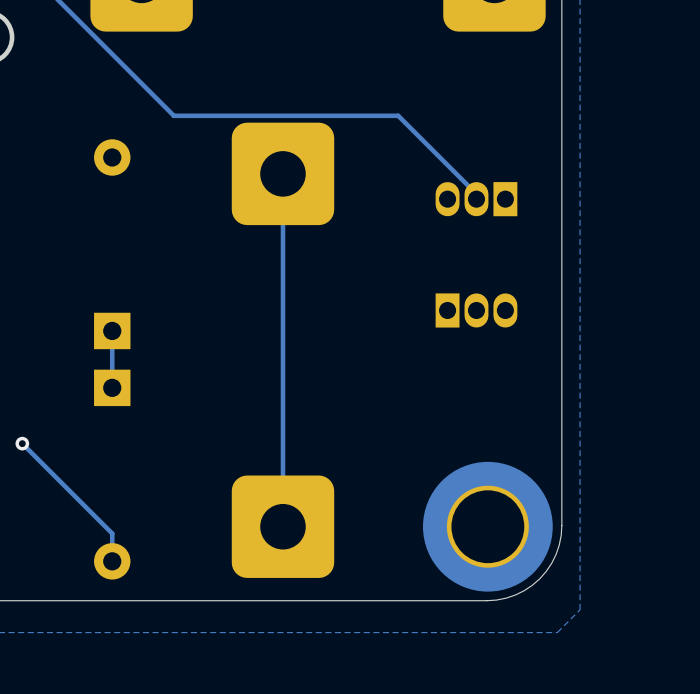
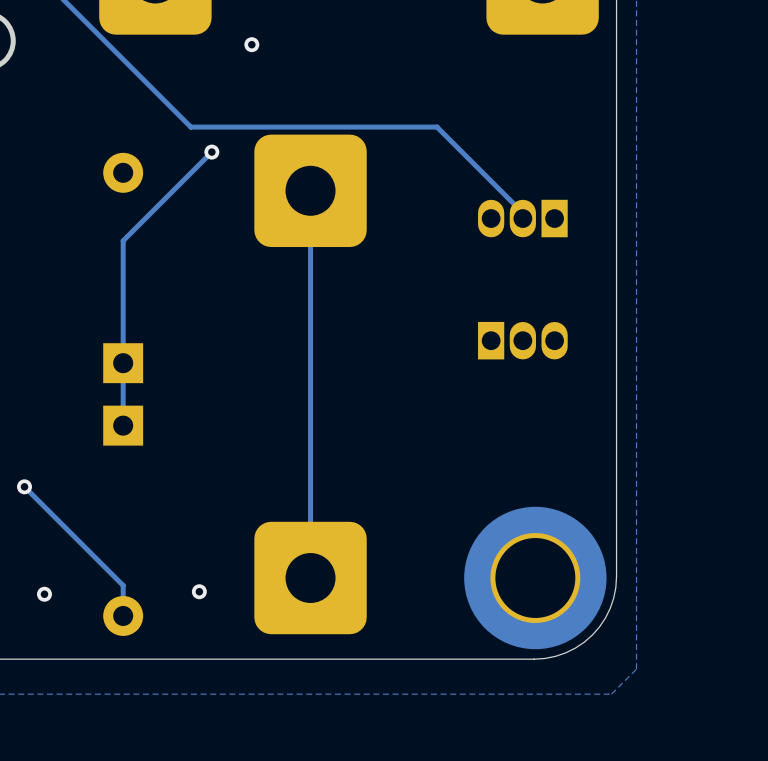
via: none -> (251, 44)
track: none -> (211, 152) (123, 240) (123, 363)
via: none -> (211, 152)
via: none -> (199, 591)
via: none -> (44, 594)

